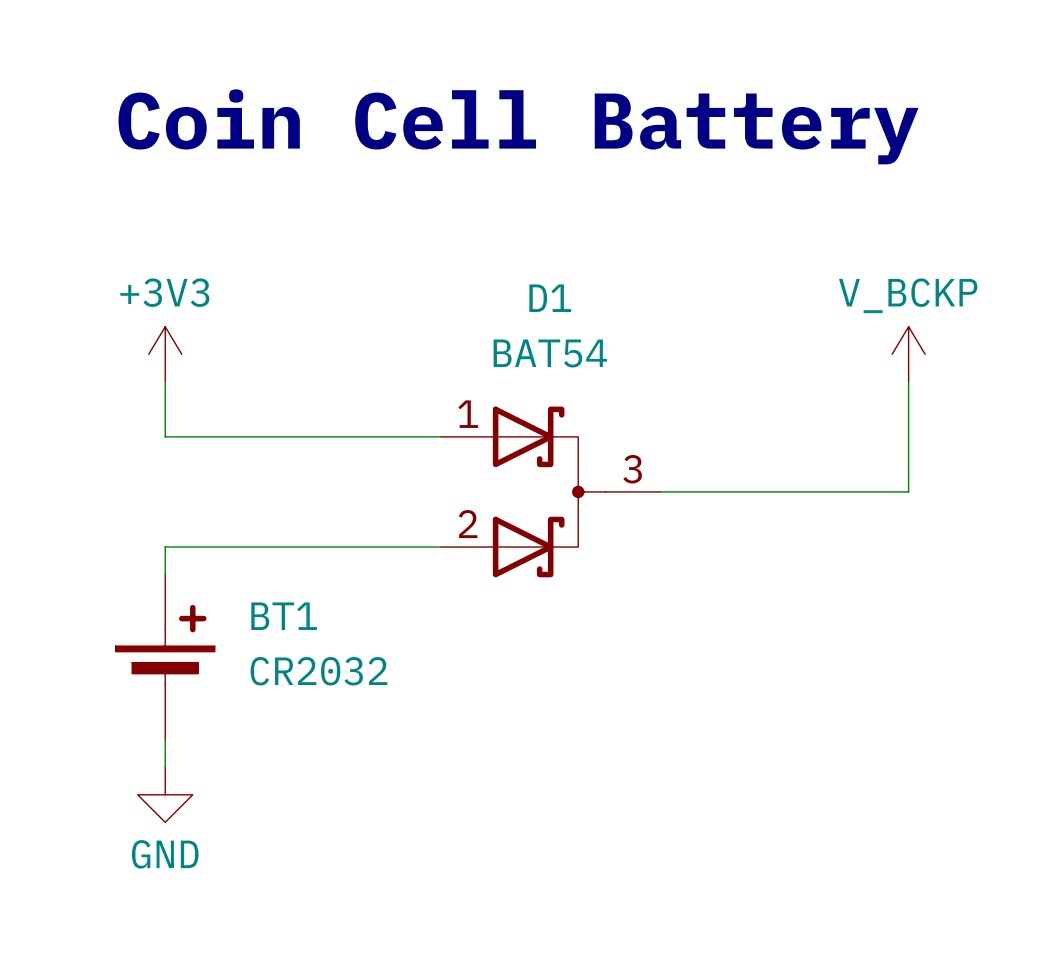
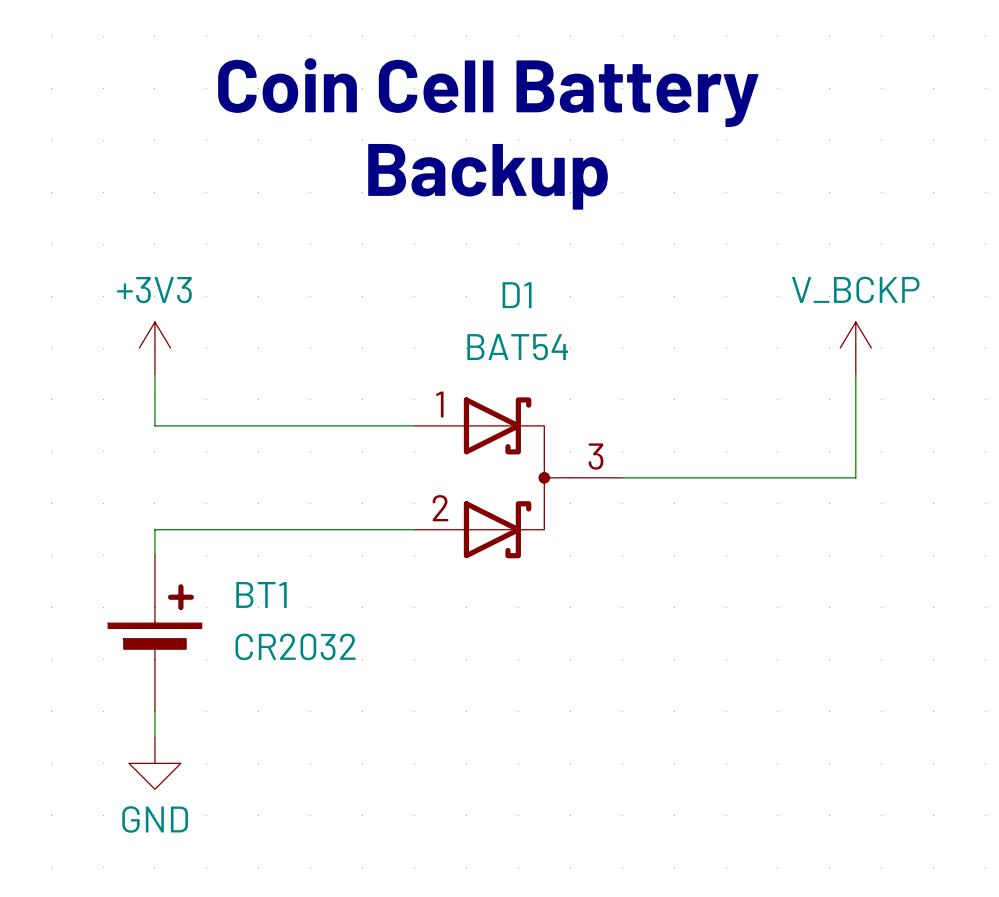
text position: Coin Cell Battery (518, 126) -> Coin Cell Battery (488, 92)
text: none -> Backup (488, 176)

